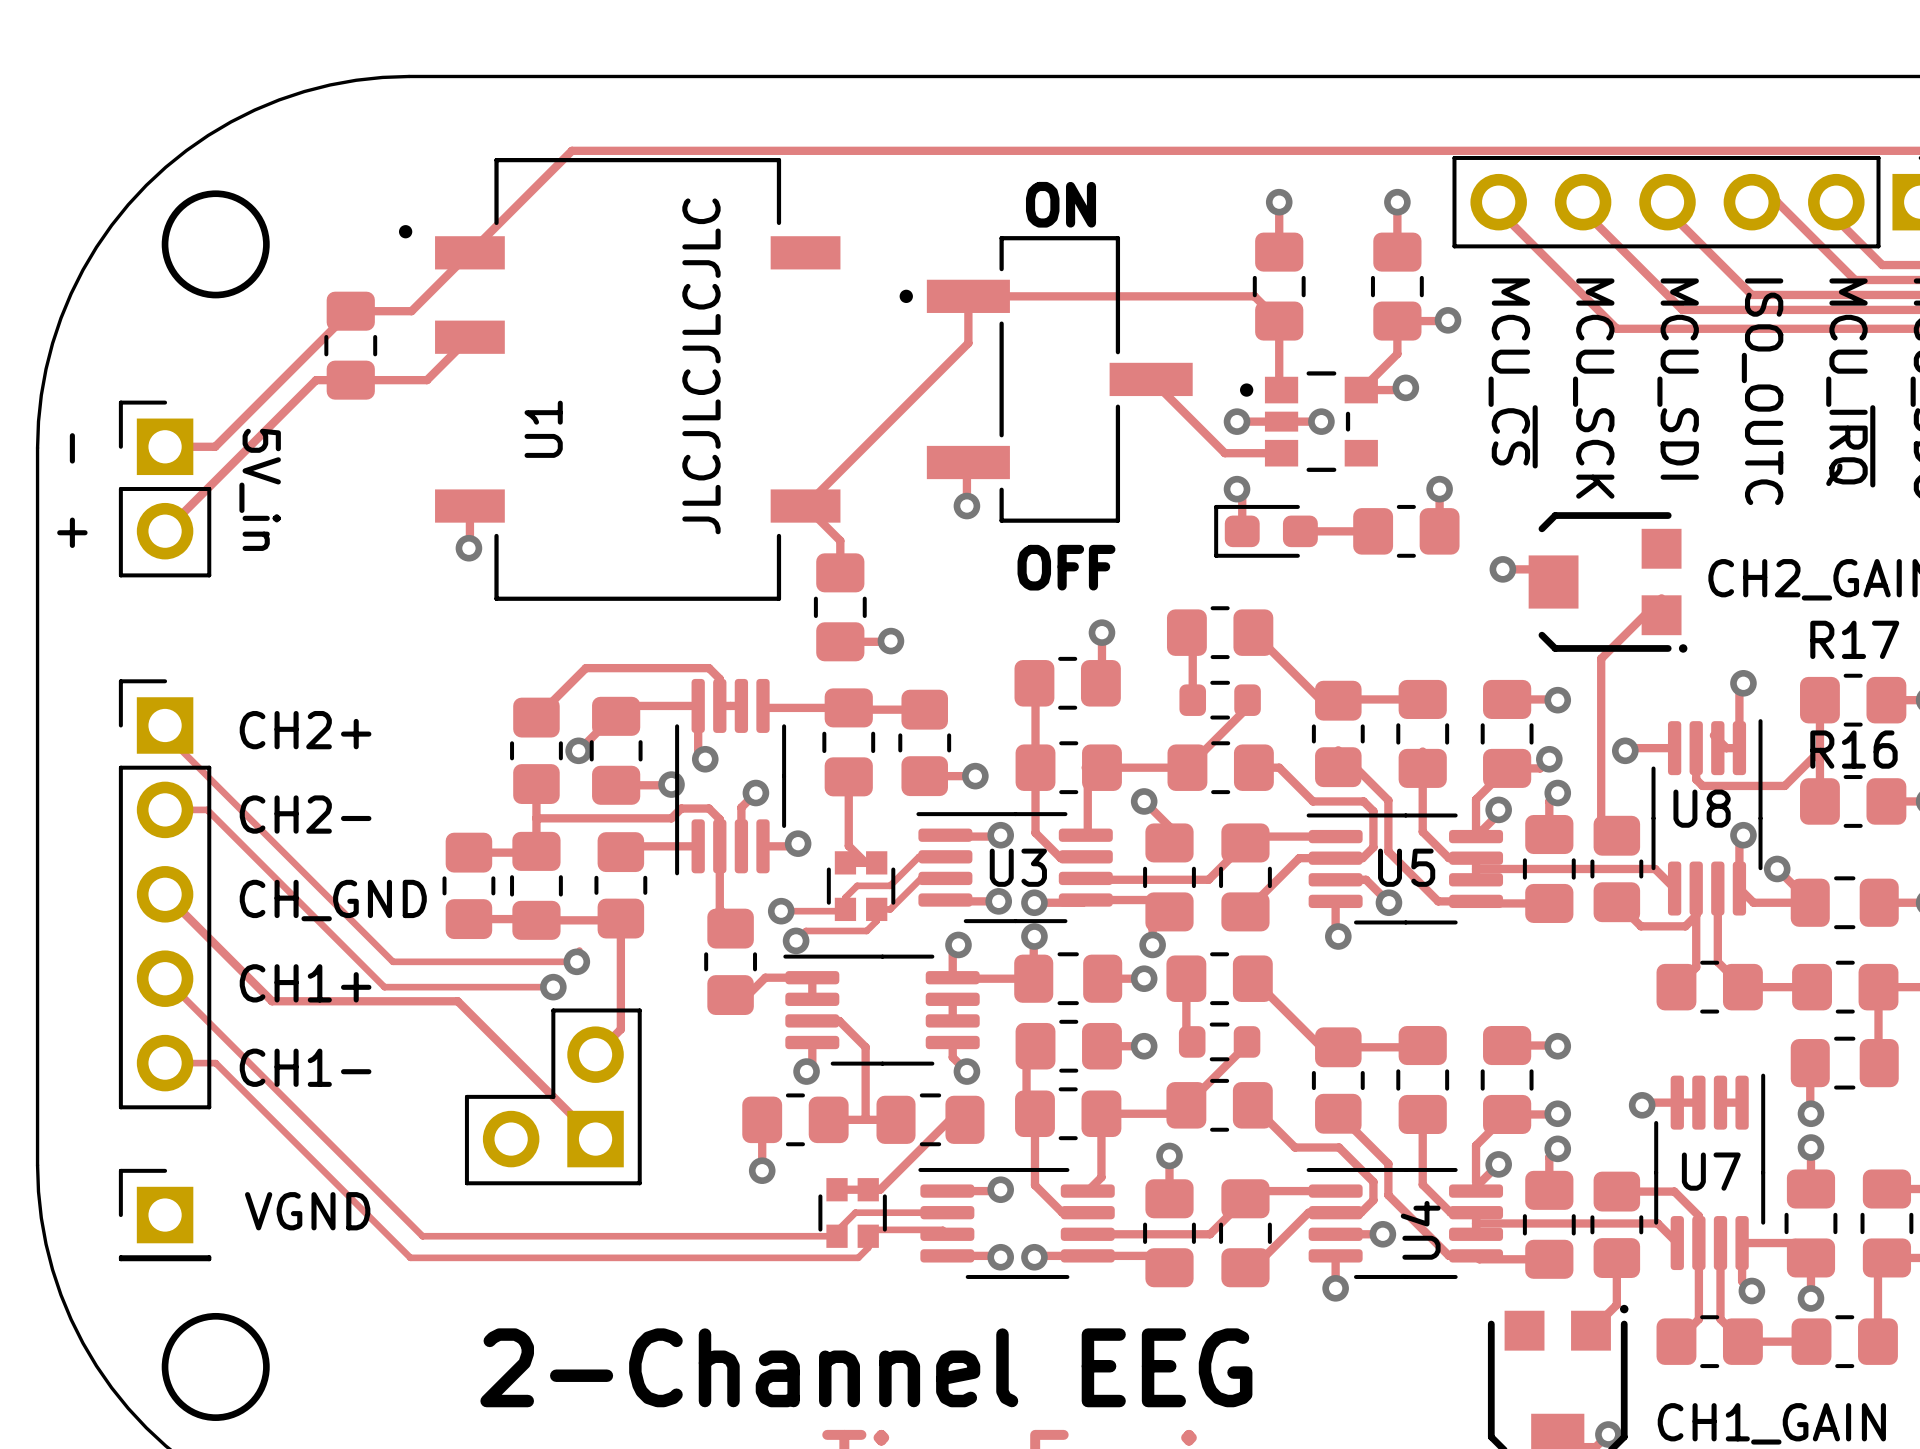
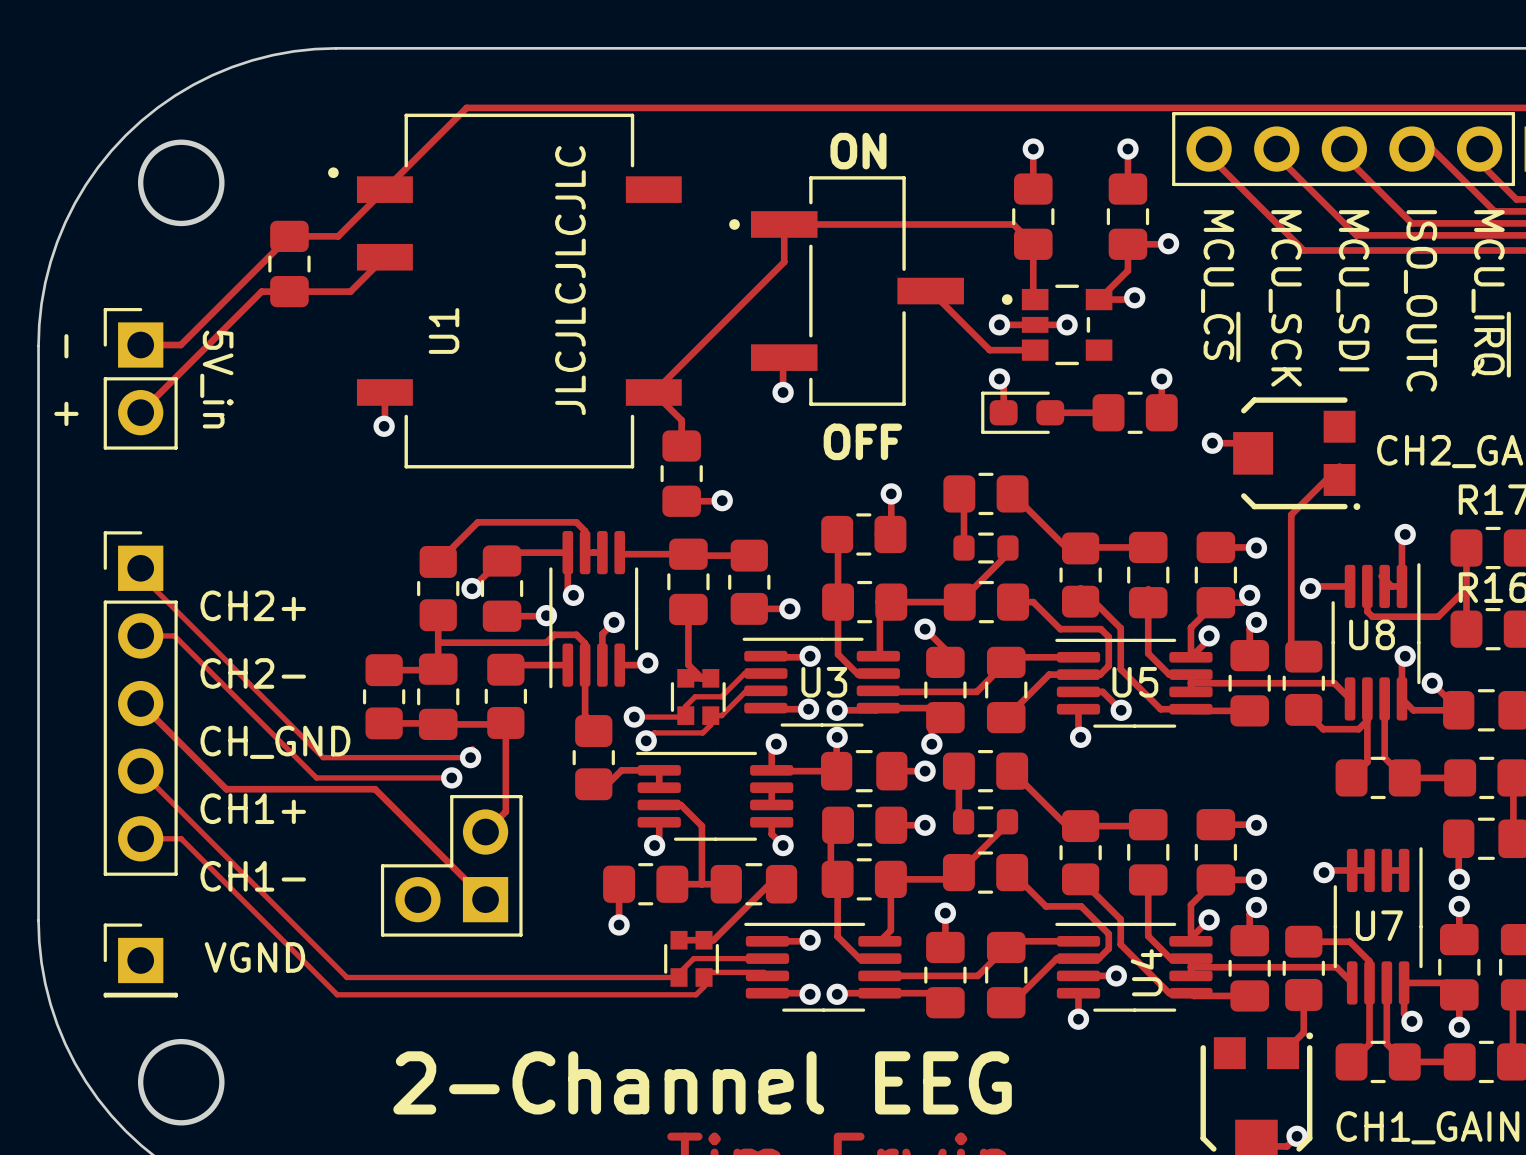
text position: CH2+ (305, 730) -> CH2+ (253, 605)
text position: CH2- (305, 814) -> CH2- (253, 673)
text position: CH_GND (333, 900) -> CH_GND (275, 742)
text position: CH1+ (305, 983) -> CH1+ (253, 808)
text position: CH1- (305, 1067) -> CH1- (253, 876)

